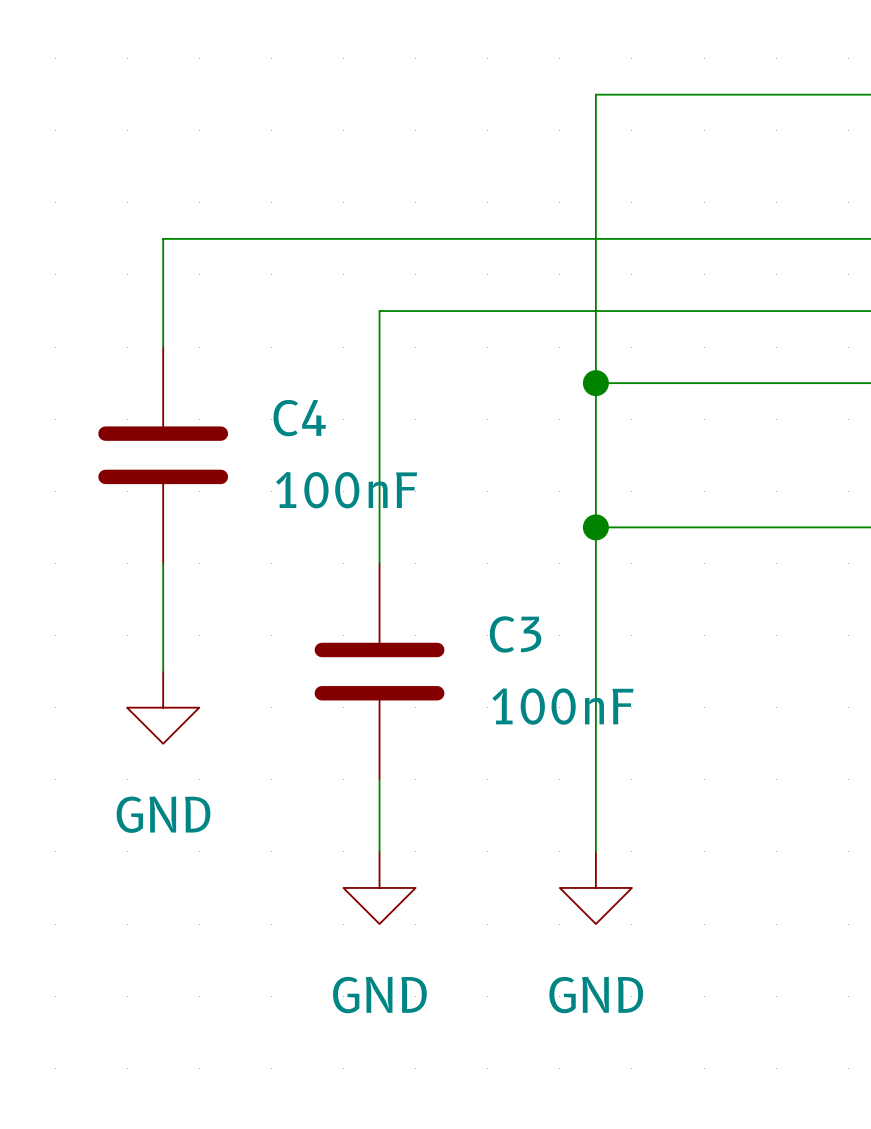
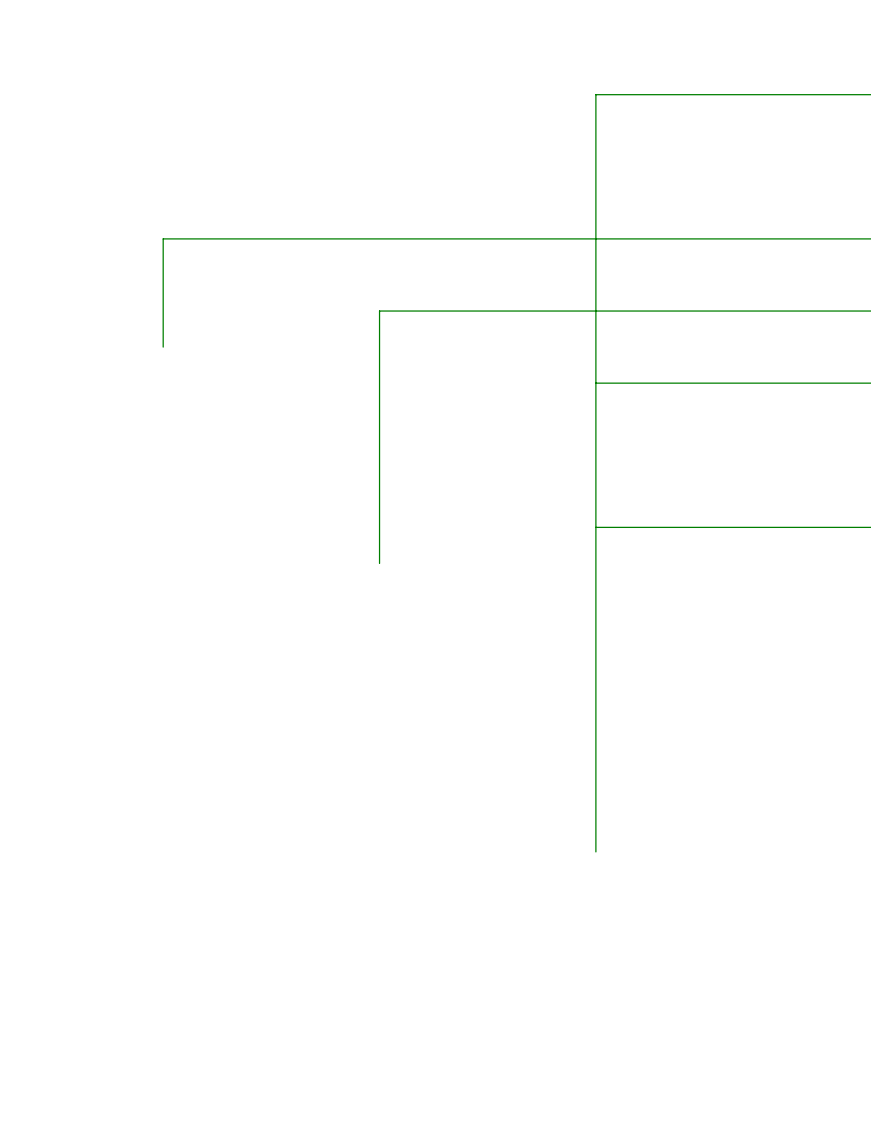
junction: (595, 383) -> none
C4: 100nF (163, 455) -> none
junction: (595, 527) -> none
wire: (163, 563) (163, 671) -> none
C3: 100nF (379, 671) -> none
power symbol: GND (163, 707) -> none
wire: (379, 779) (379, 851) -> none
power symbol: GND (379, 887) -> none
power symbol: GND (595, 887) -> none

